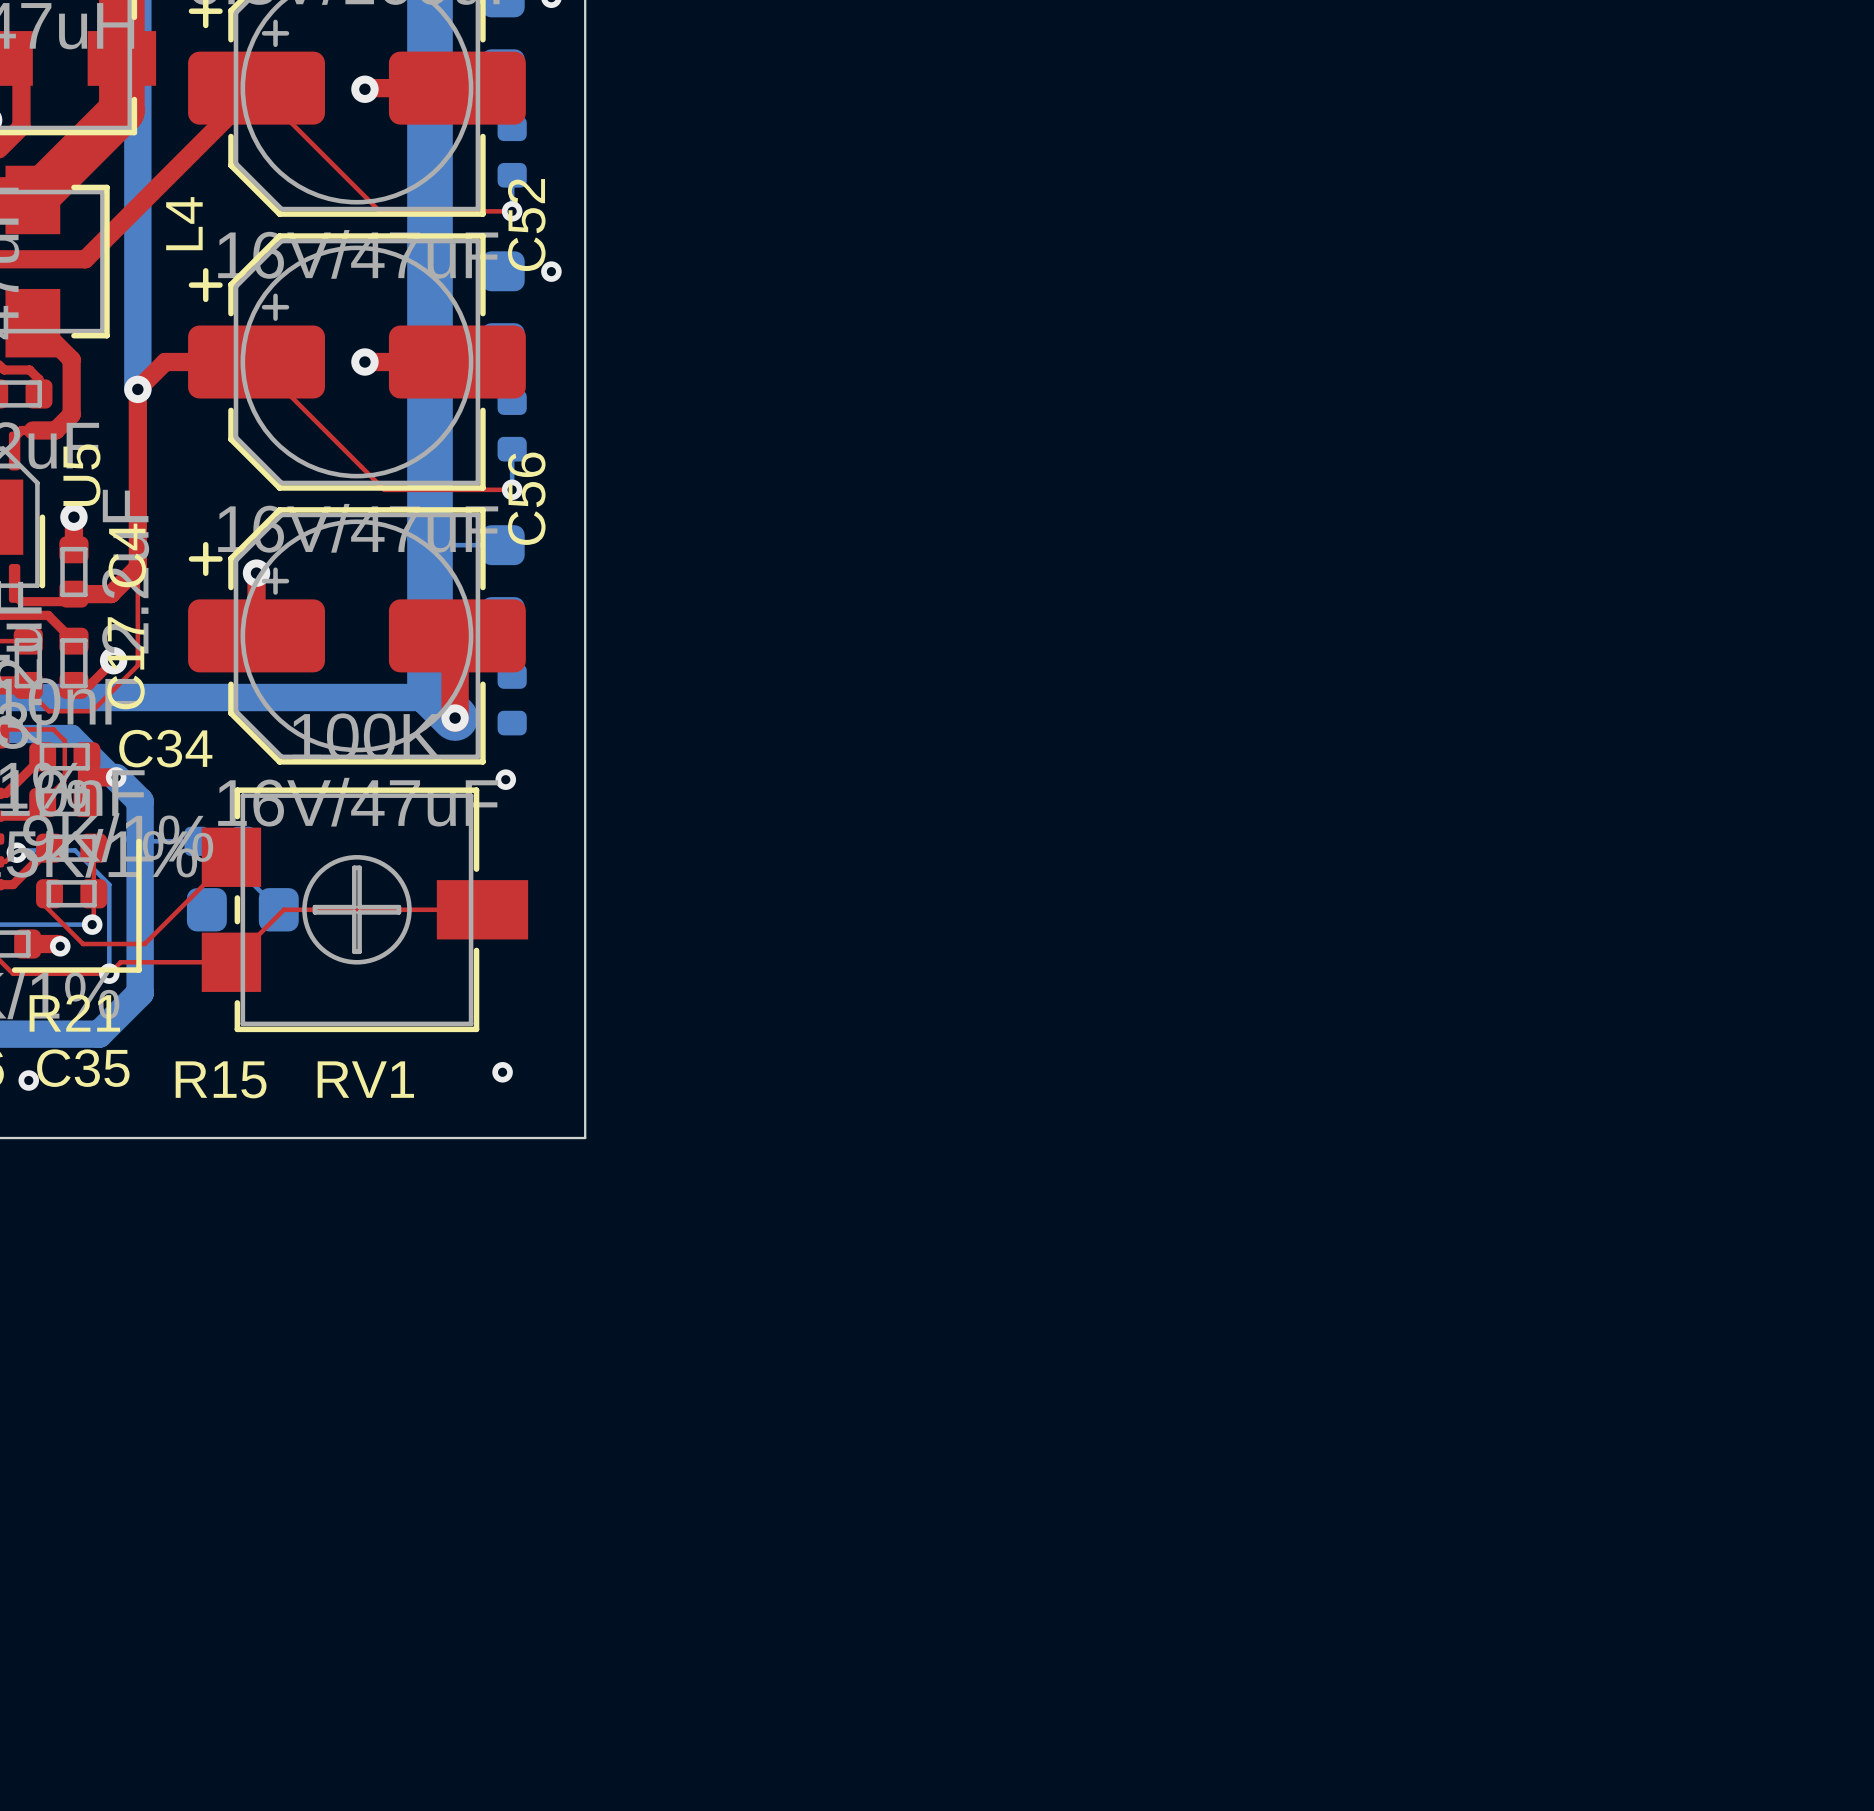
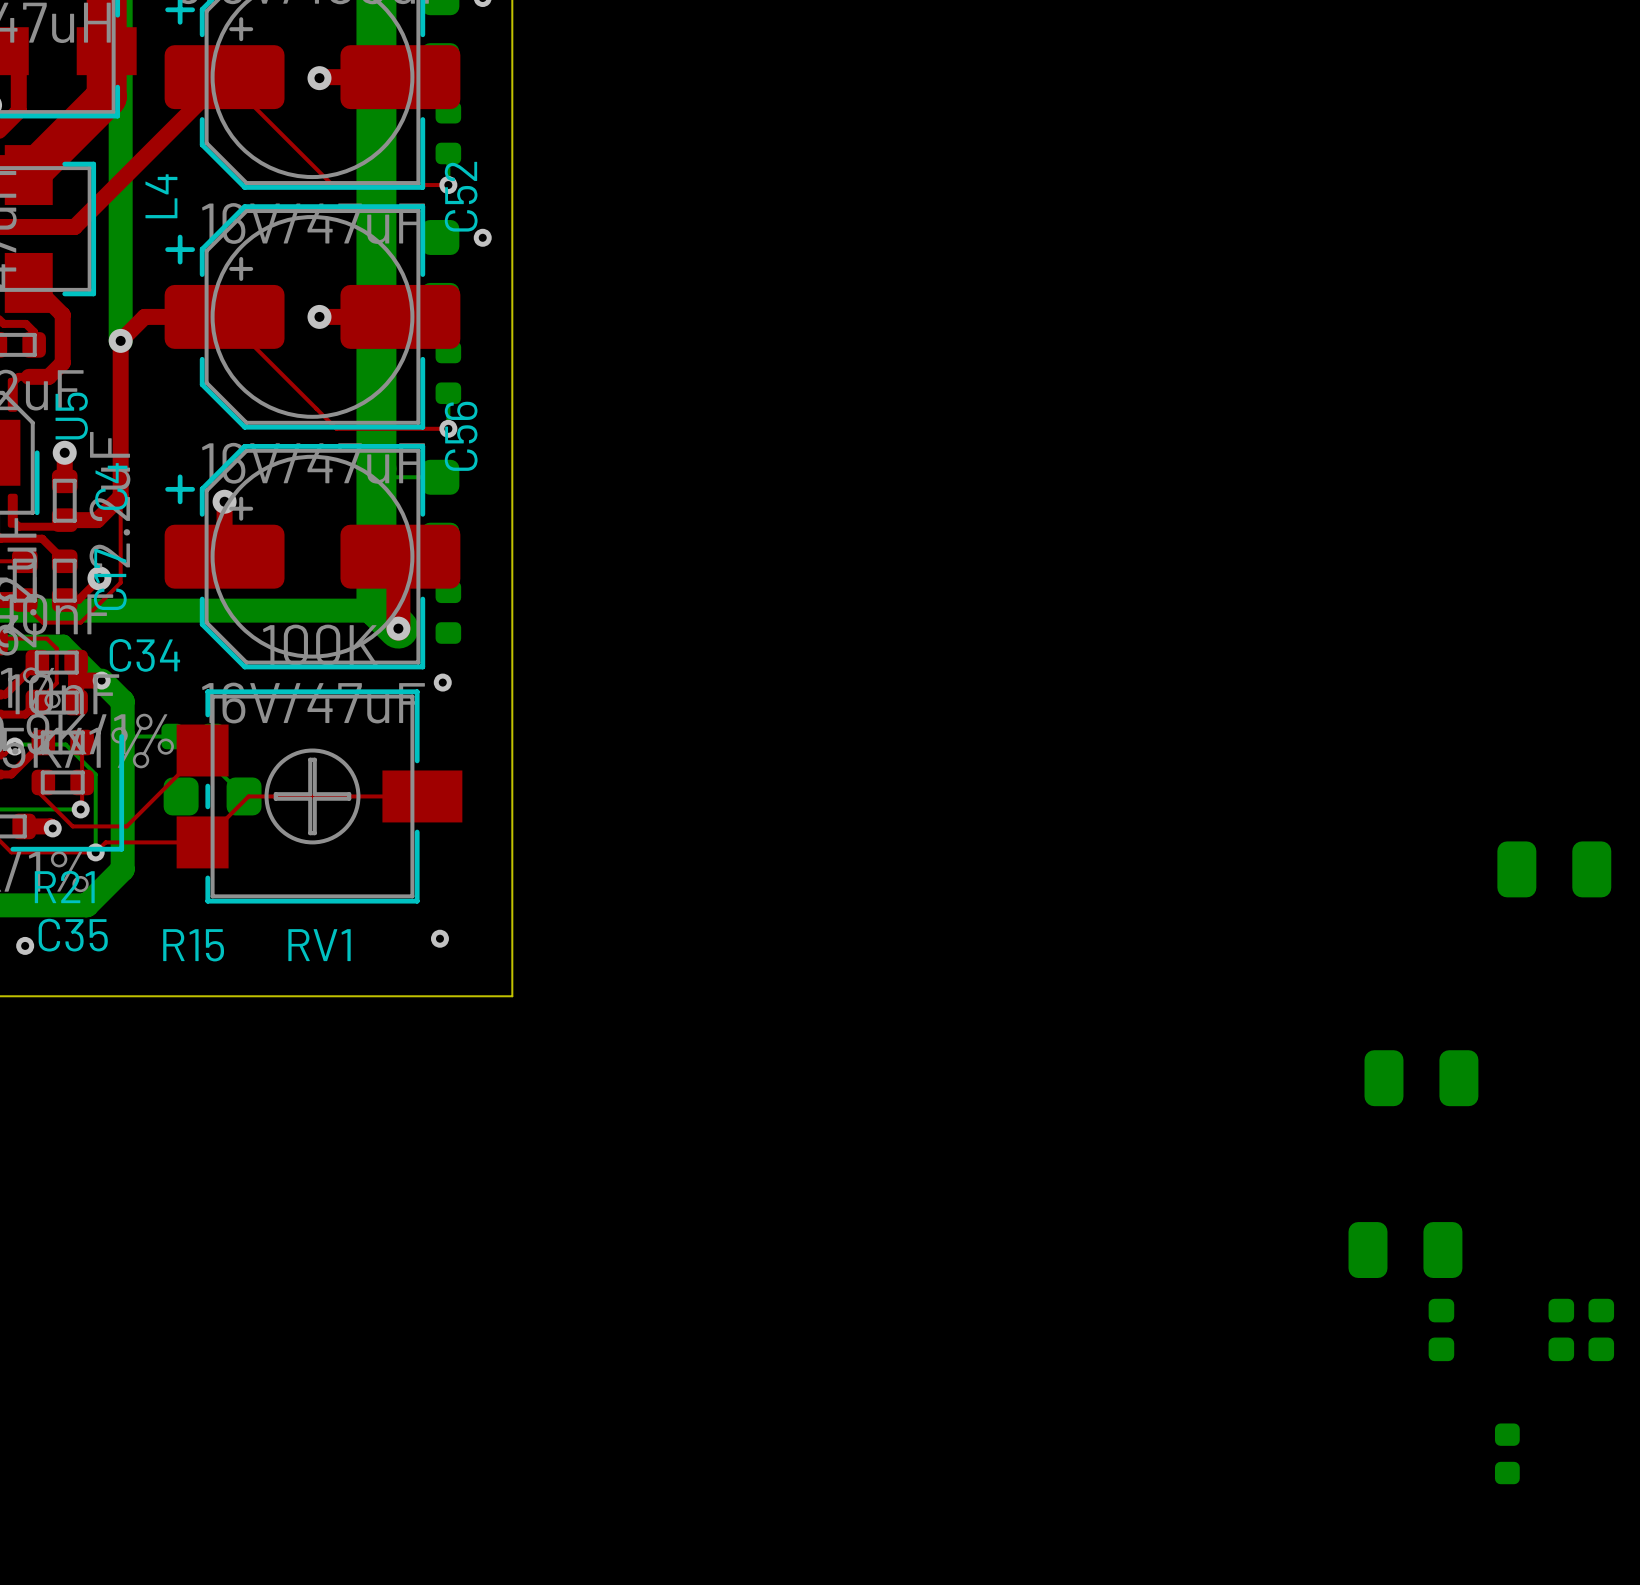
part: none -> (1554, 869)
part: none -> (1421, 1078)
part: none -> (1405, 1250)
part: none -> (1441, 1329)
part: none -> (1561, 1329)
part: none -> (1601, 1329)
part: none -> (1507, 1453)

